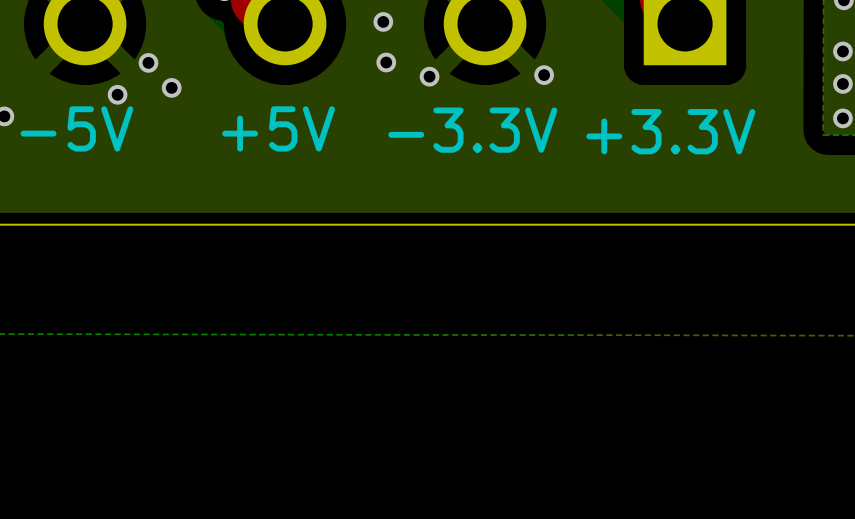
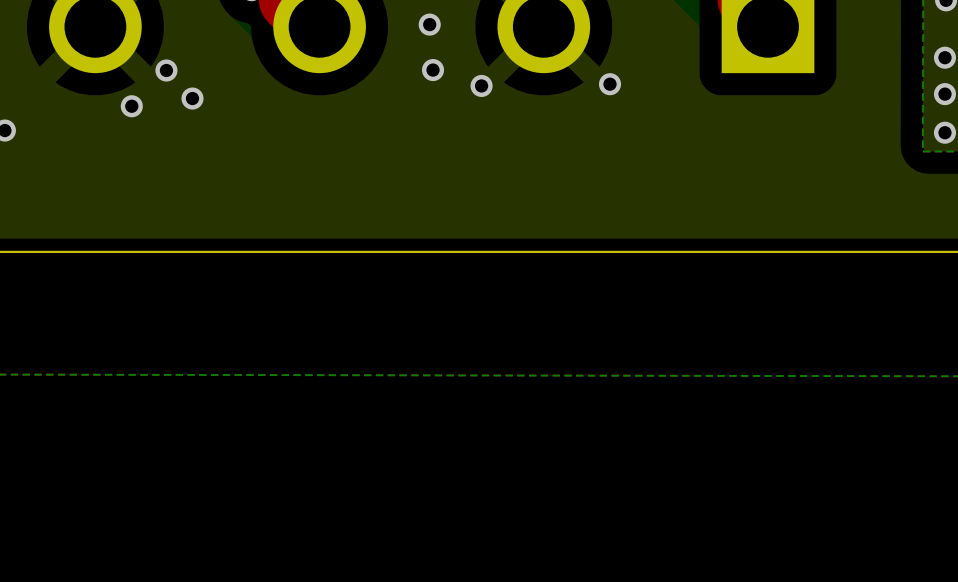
text: -5V (76, 128) -> none
text: +5V (278, 128) -> none
text: -3.3V (472, 130) -> none
text: +3.3V (670, 131) -> none

